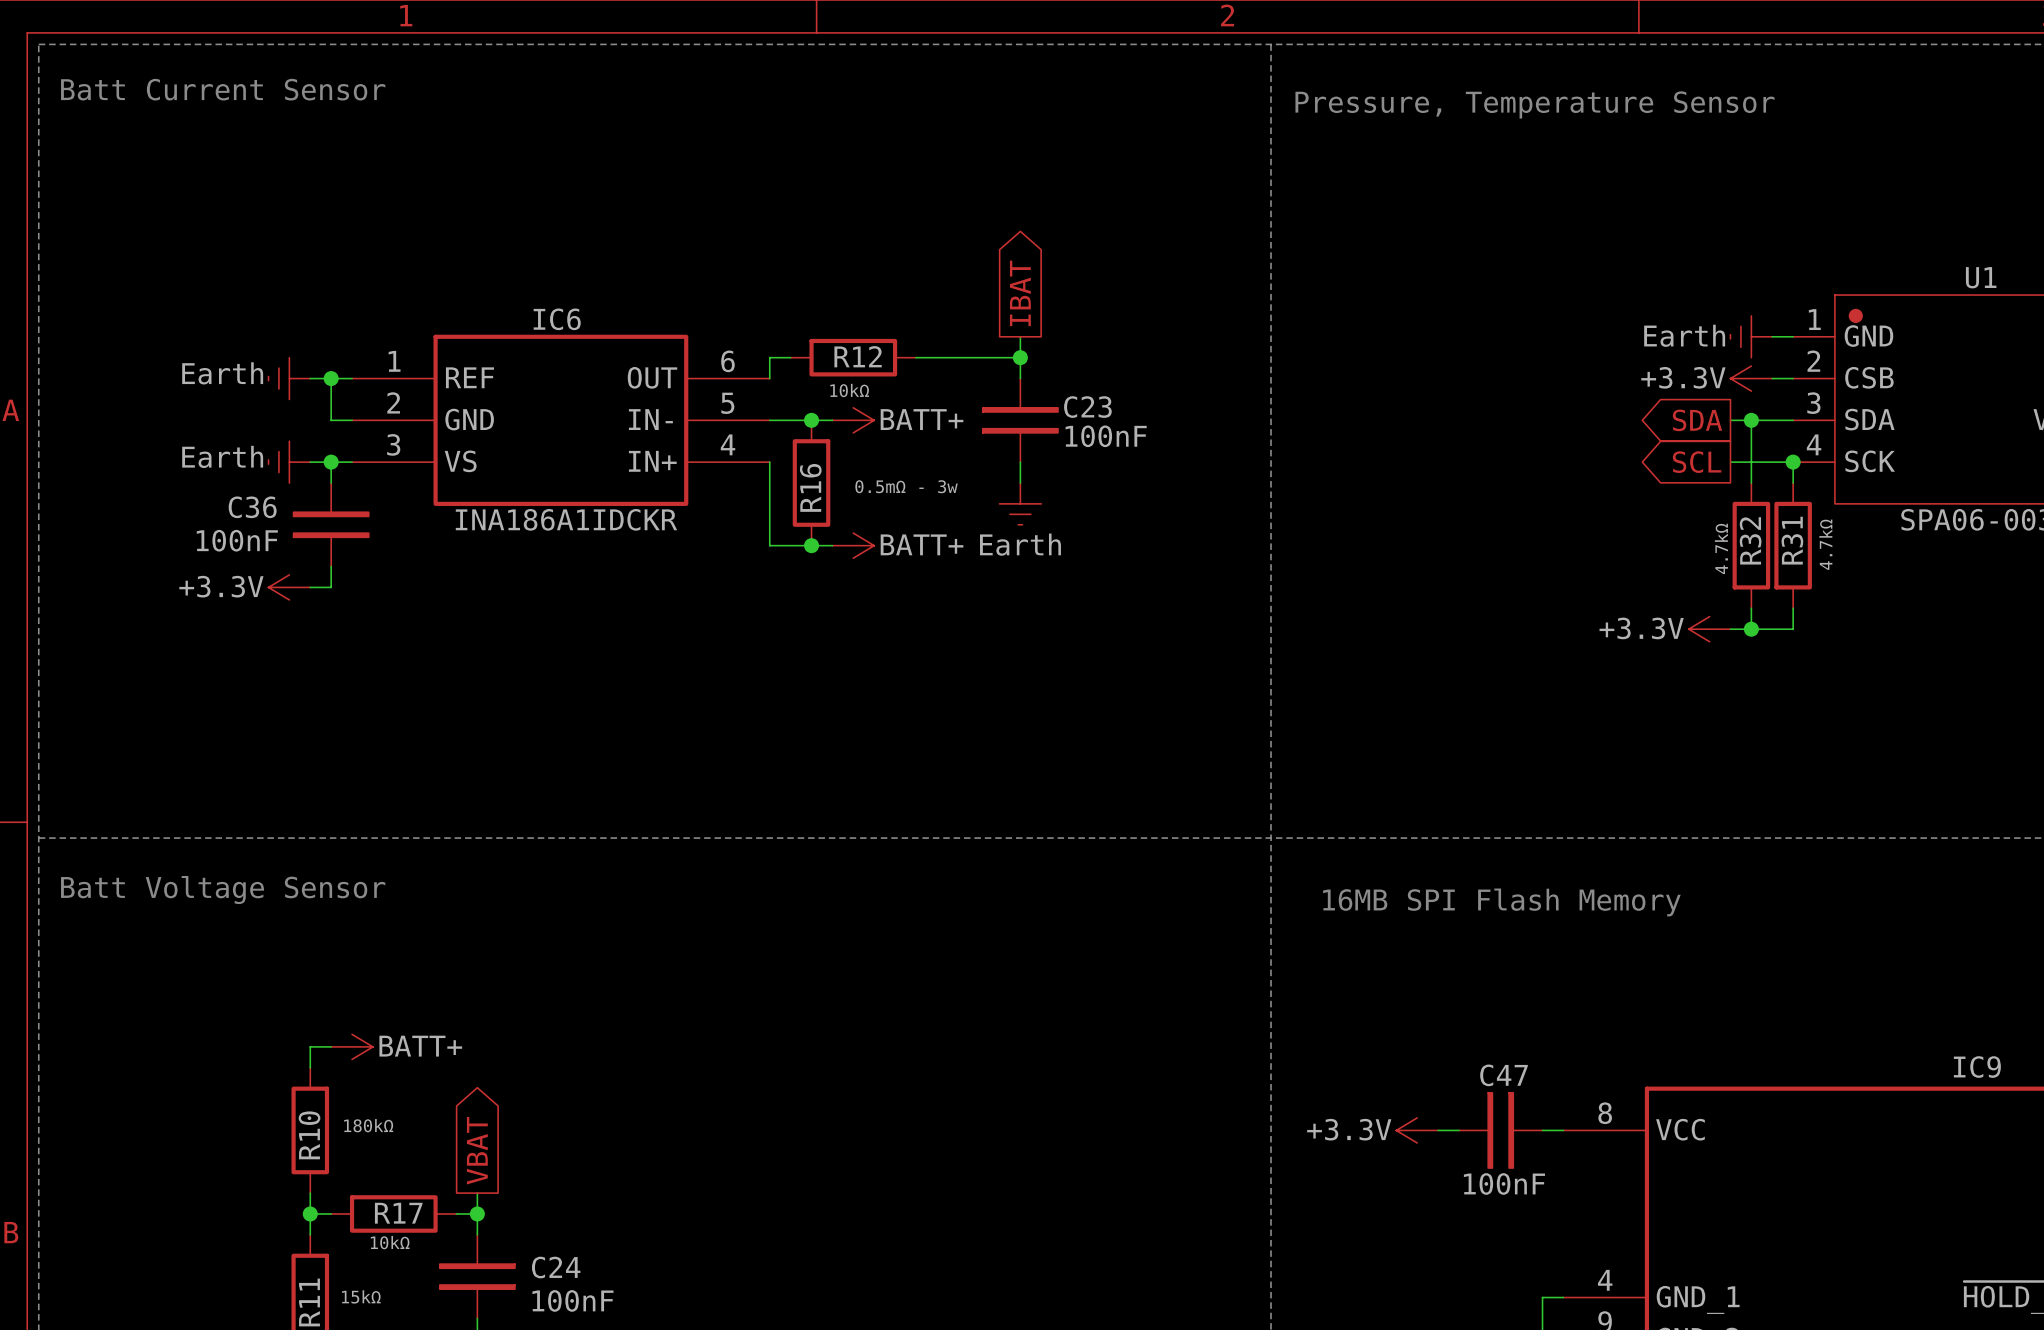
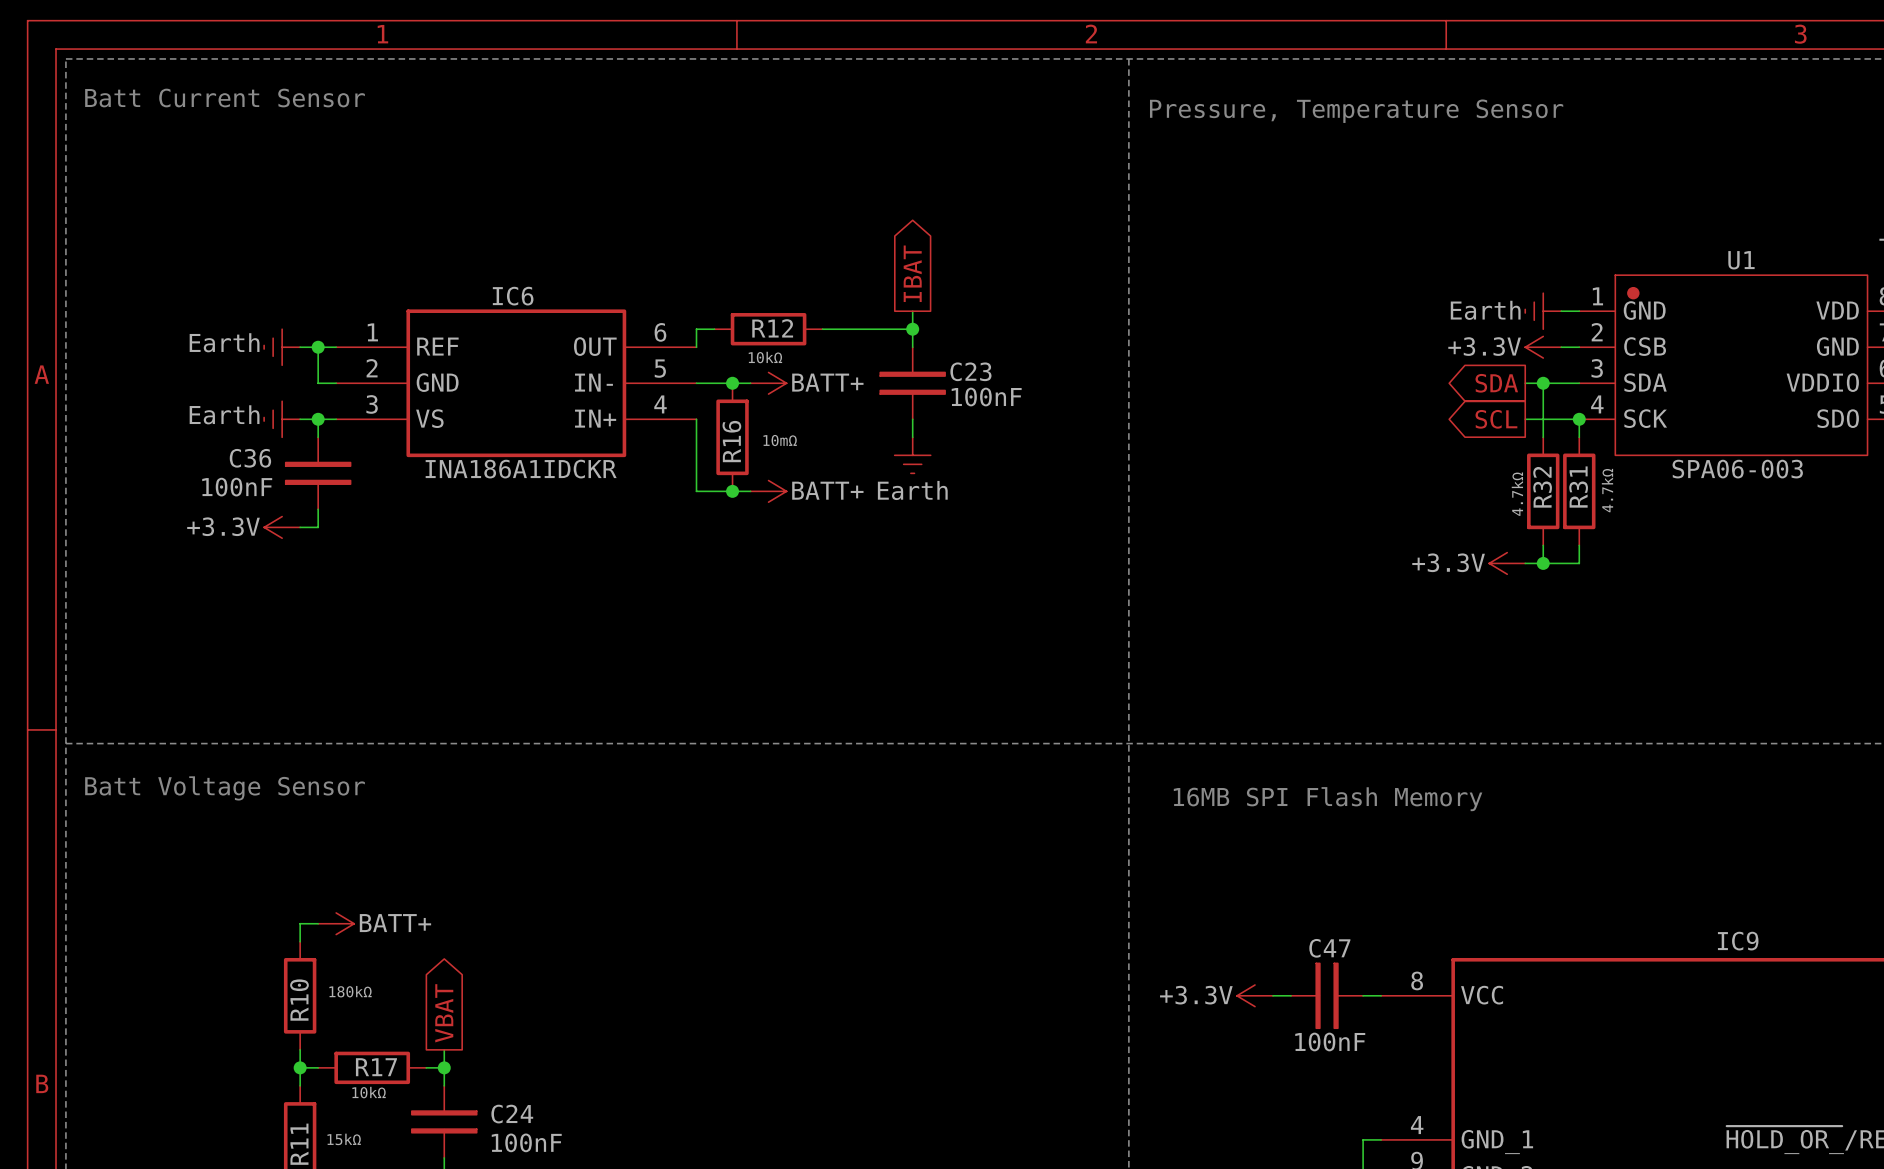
R16 value: 0.5mΩ - 3w (906, 486) -> 10mΩ (780, 440)

